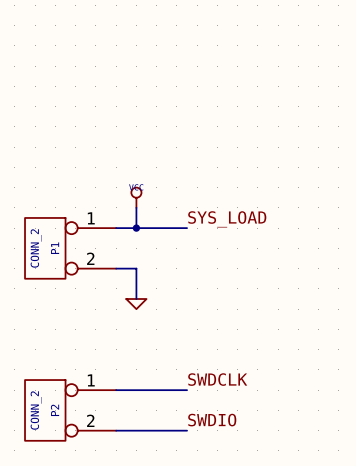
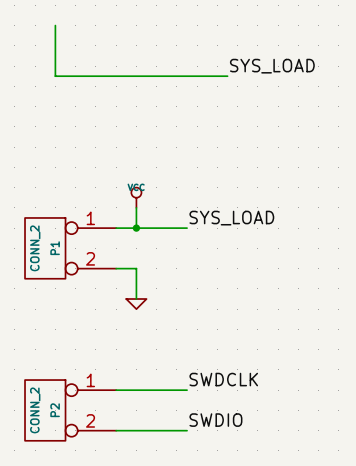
wire: none -> (55, 25) (55, 76) (227, 76)
label: none -> SYS_LOAD (272, 66)

